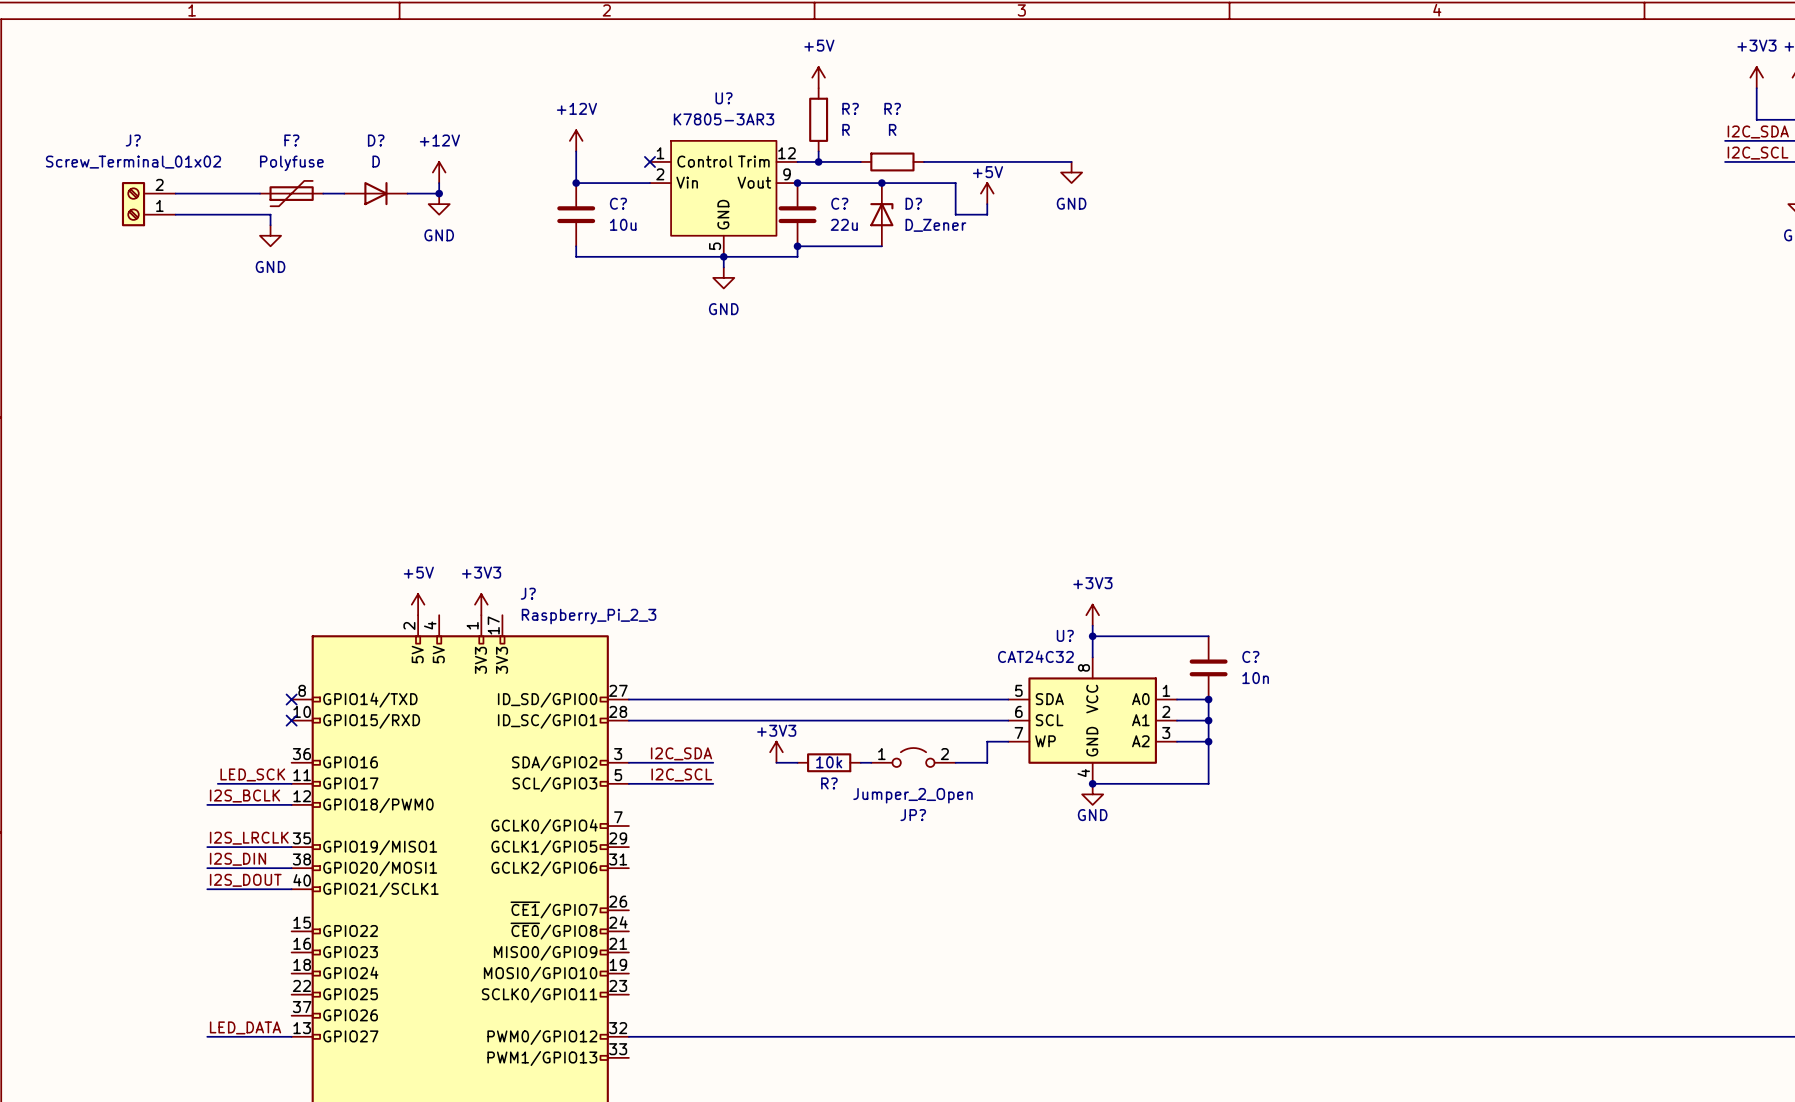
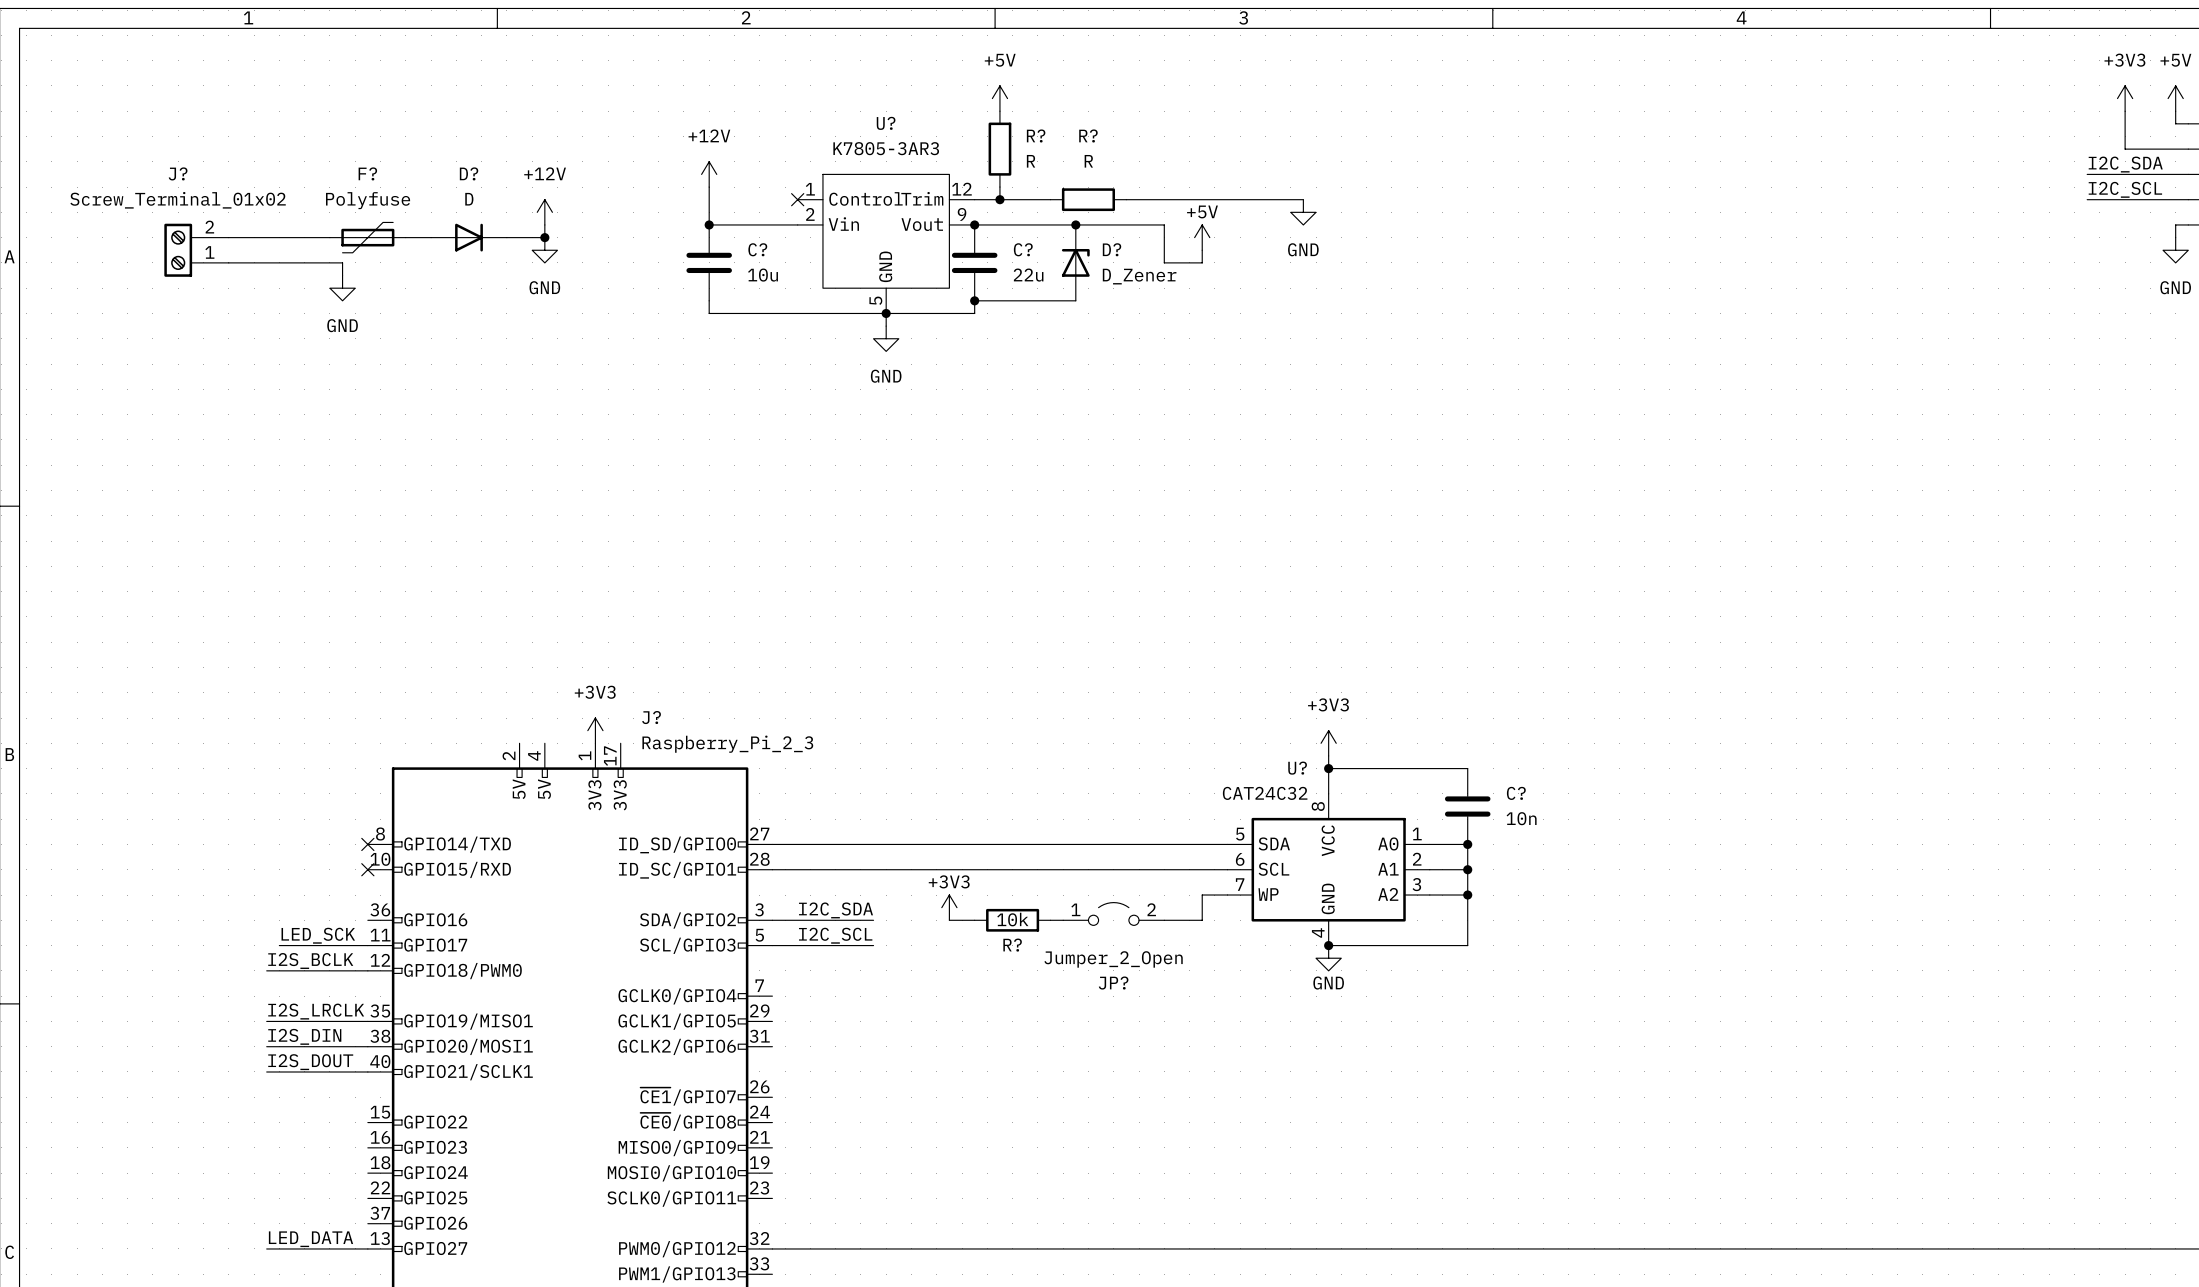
power symbol: +5V (418, 604) -> none

